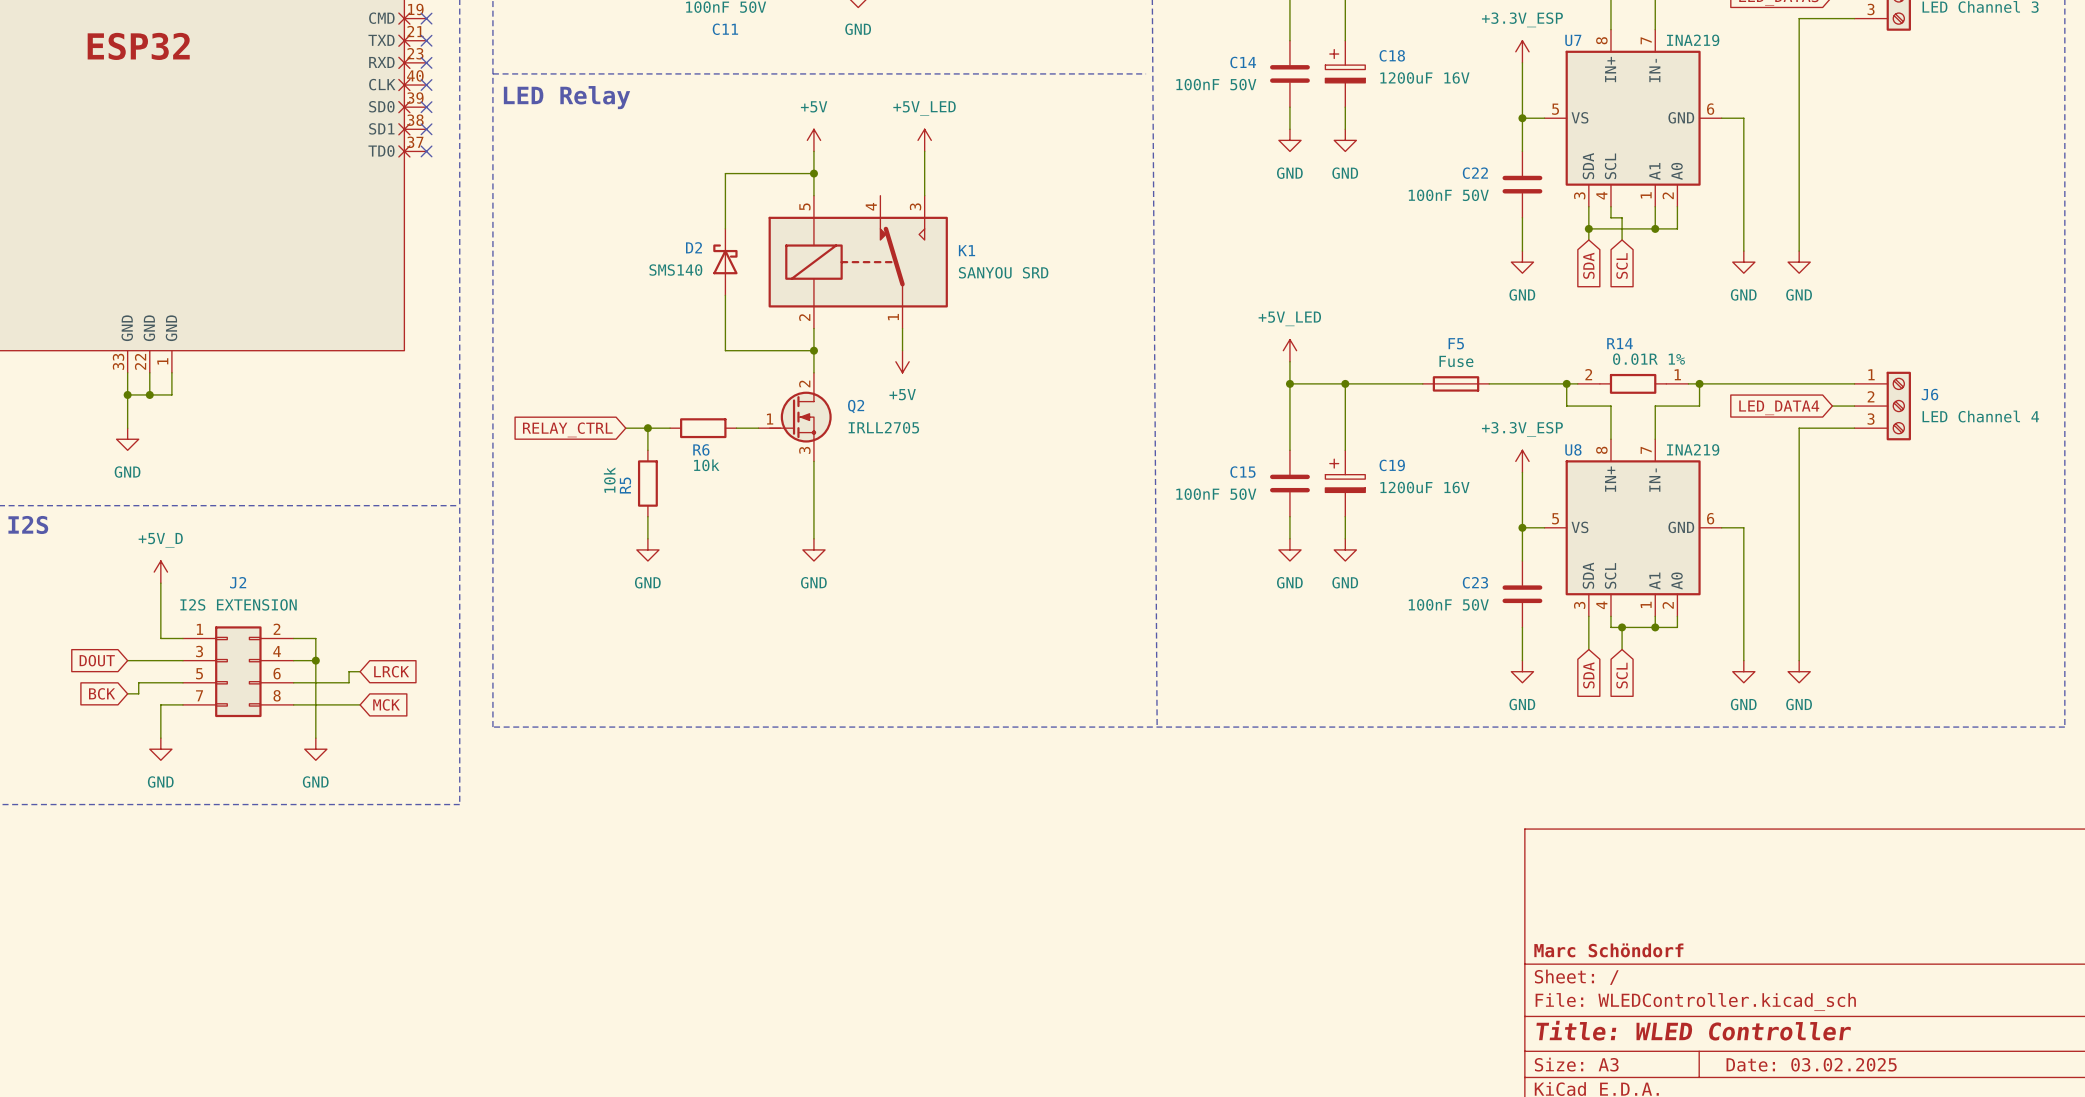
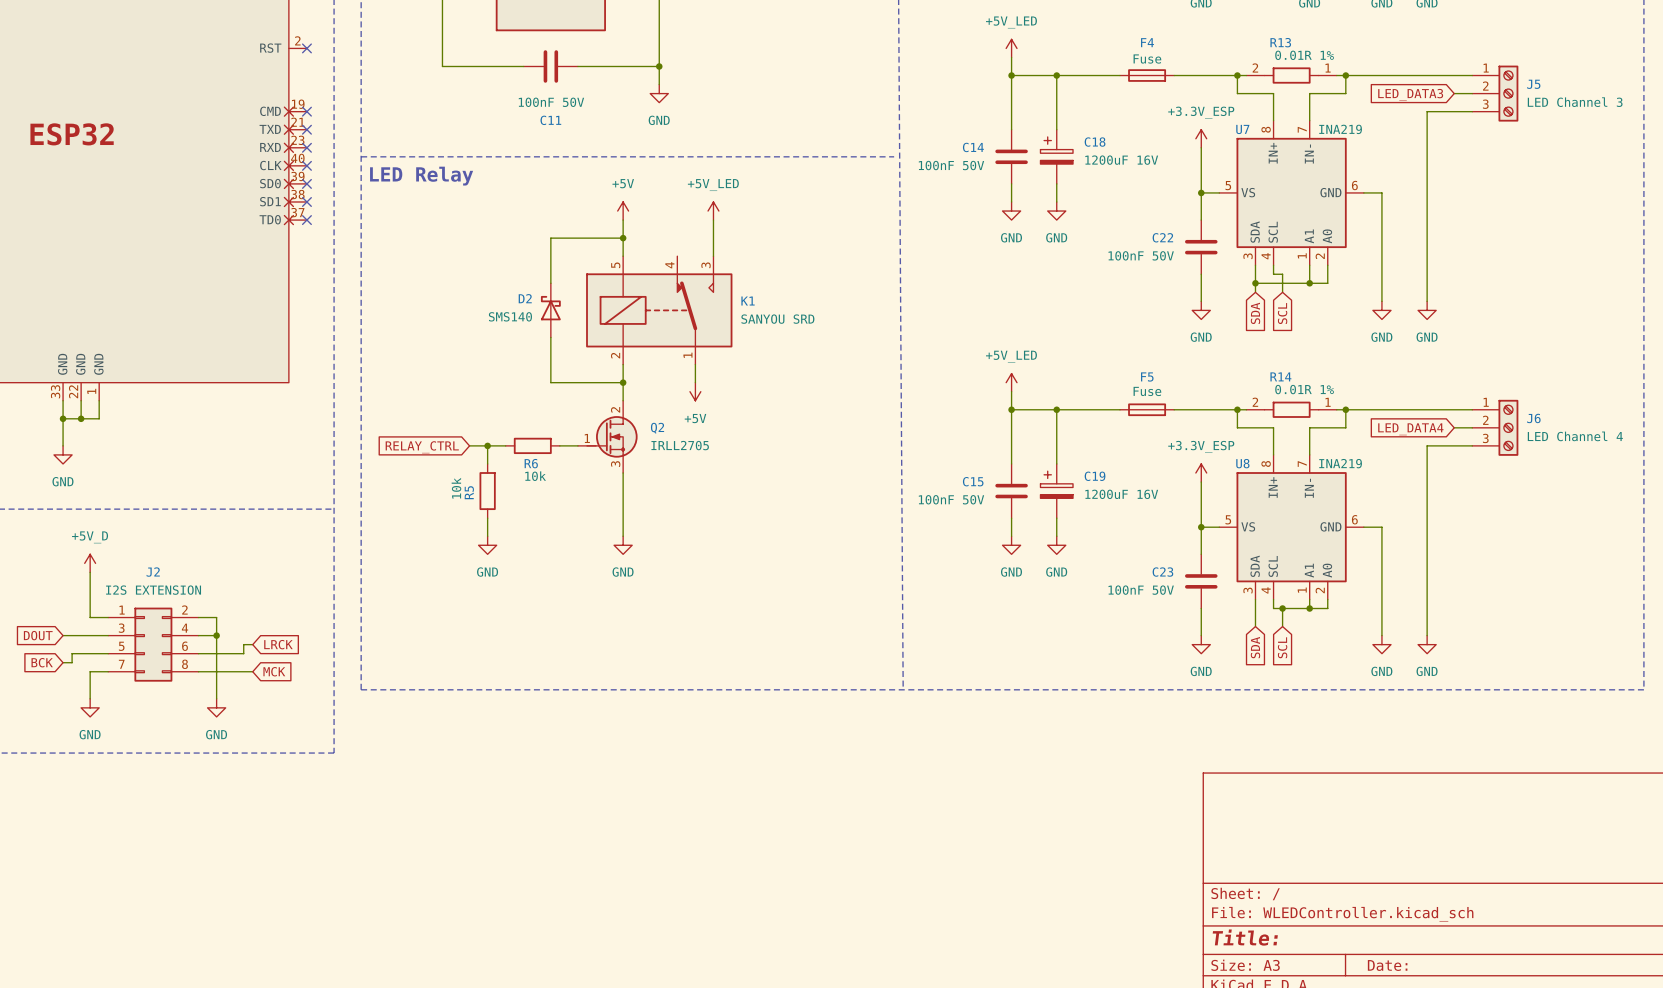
title block: Marc Schöndorf (1608, 950) -> none
title block: Title: WLED Controller (1693, 1030) -> Title: (1245, 937)
title block: Date: 03.02.2025 (1811, 1064) -> Date: (1387, 965)

